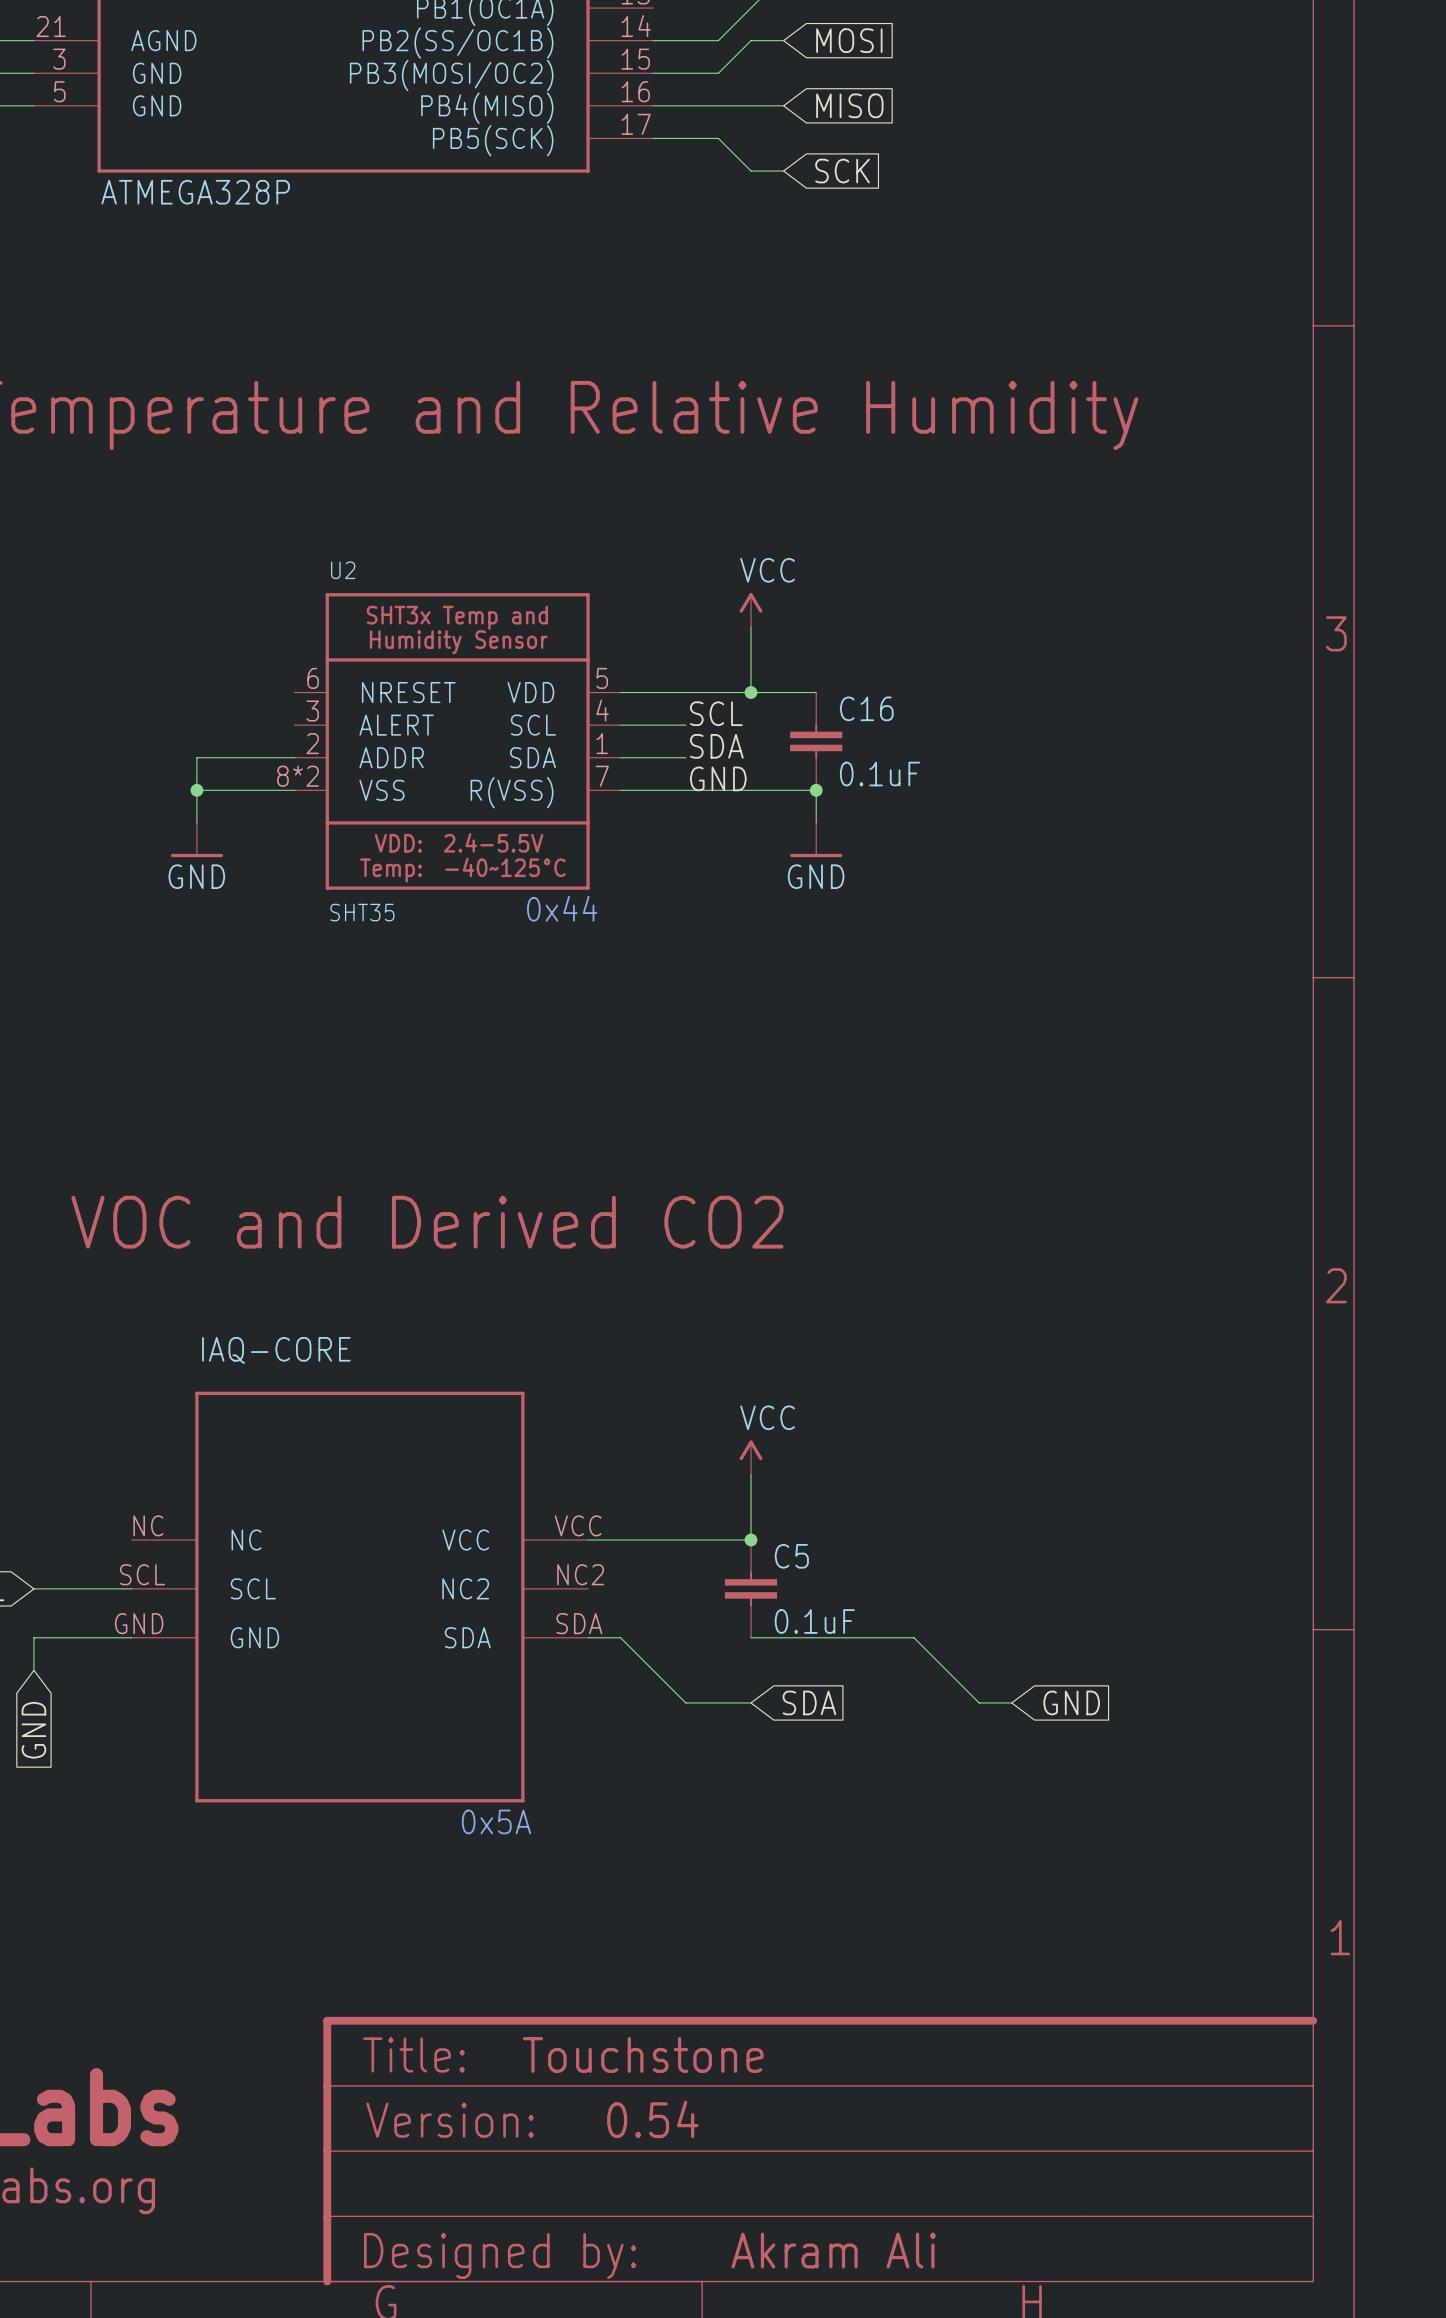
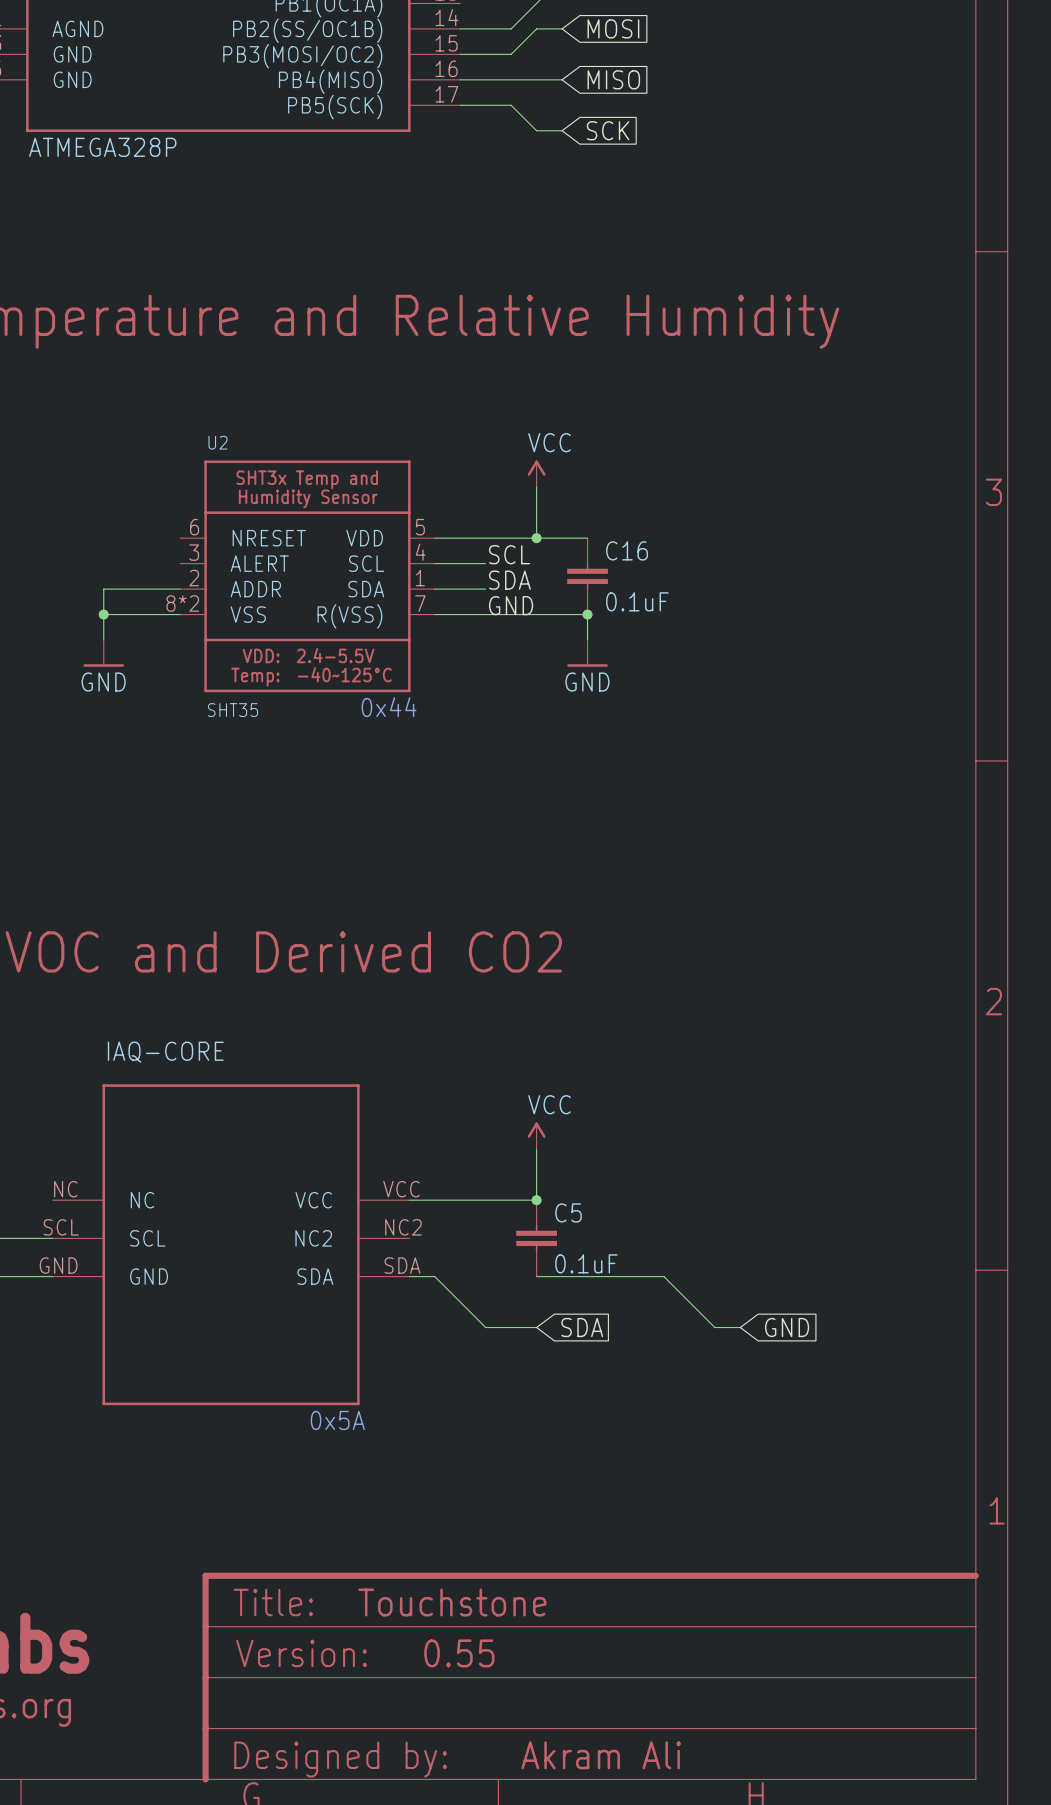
text: 0.54 (652, 2119) -> 0.55 (459, 1653)

